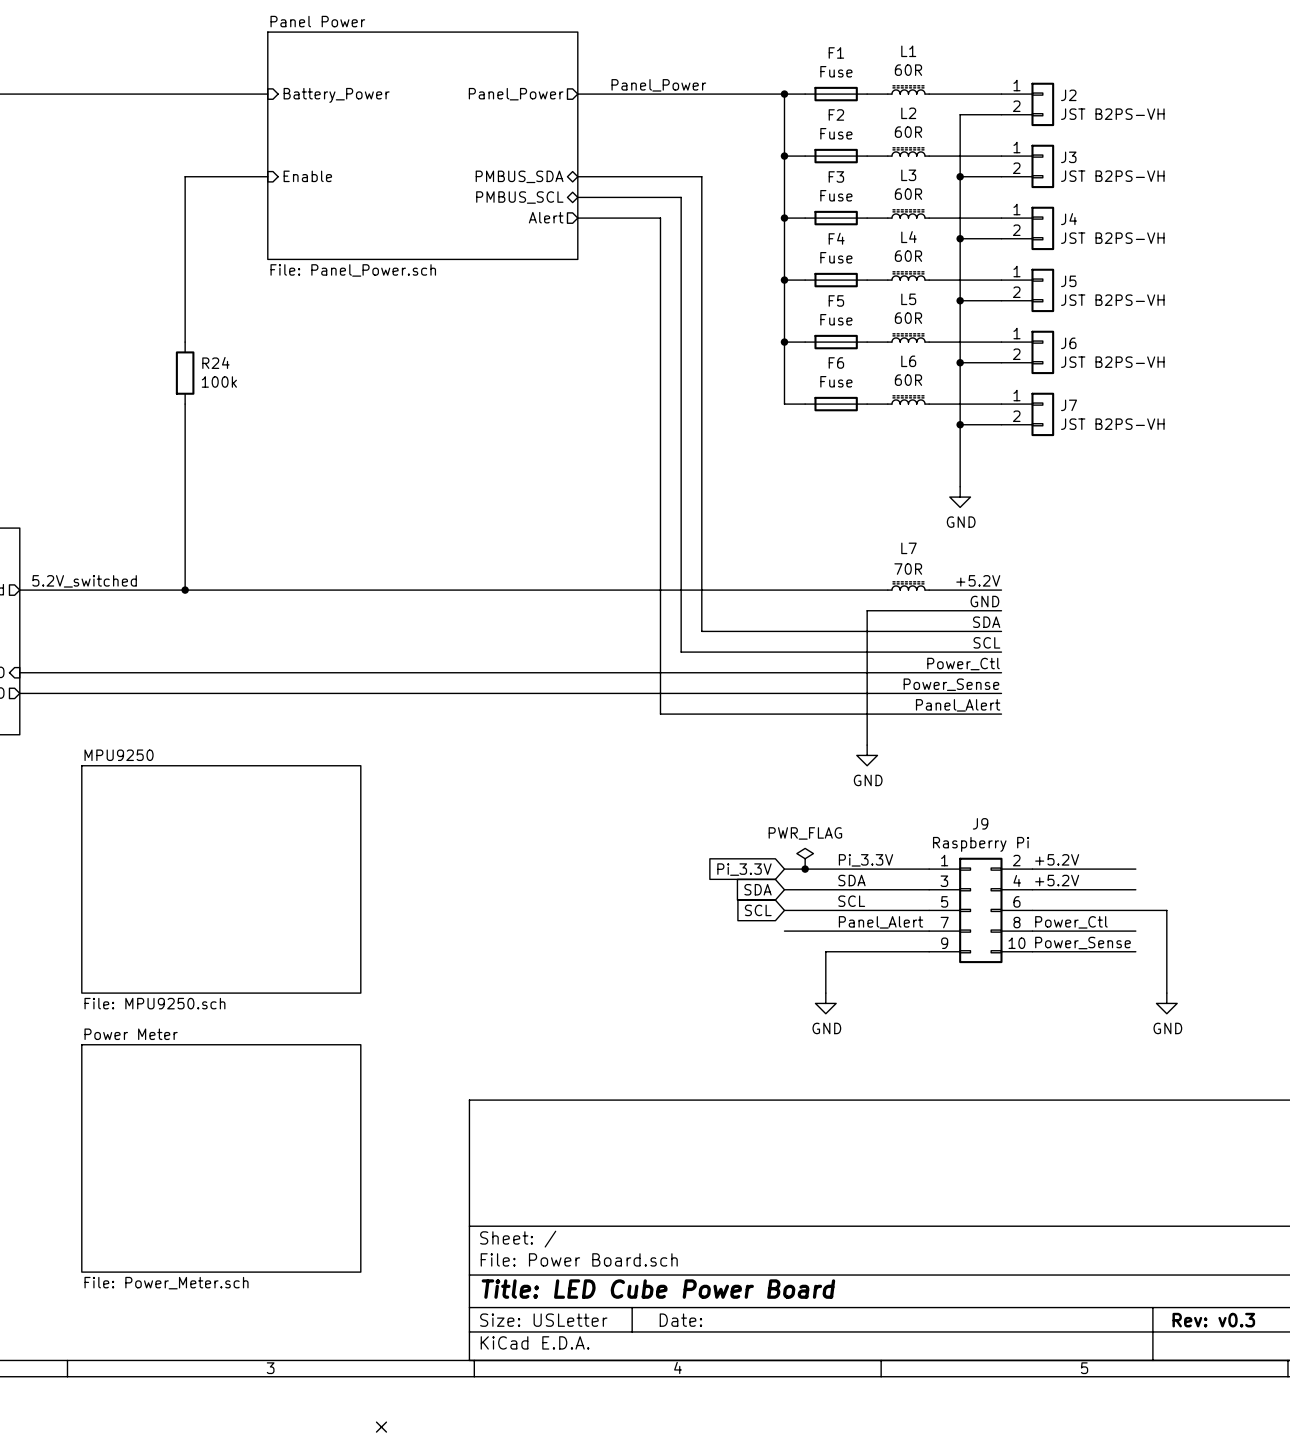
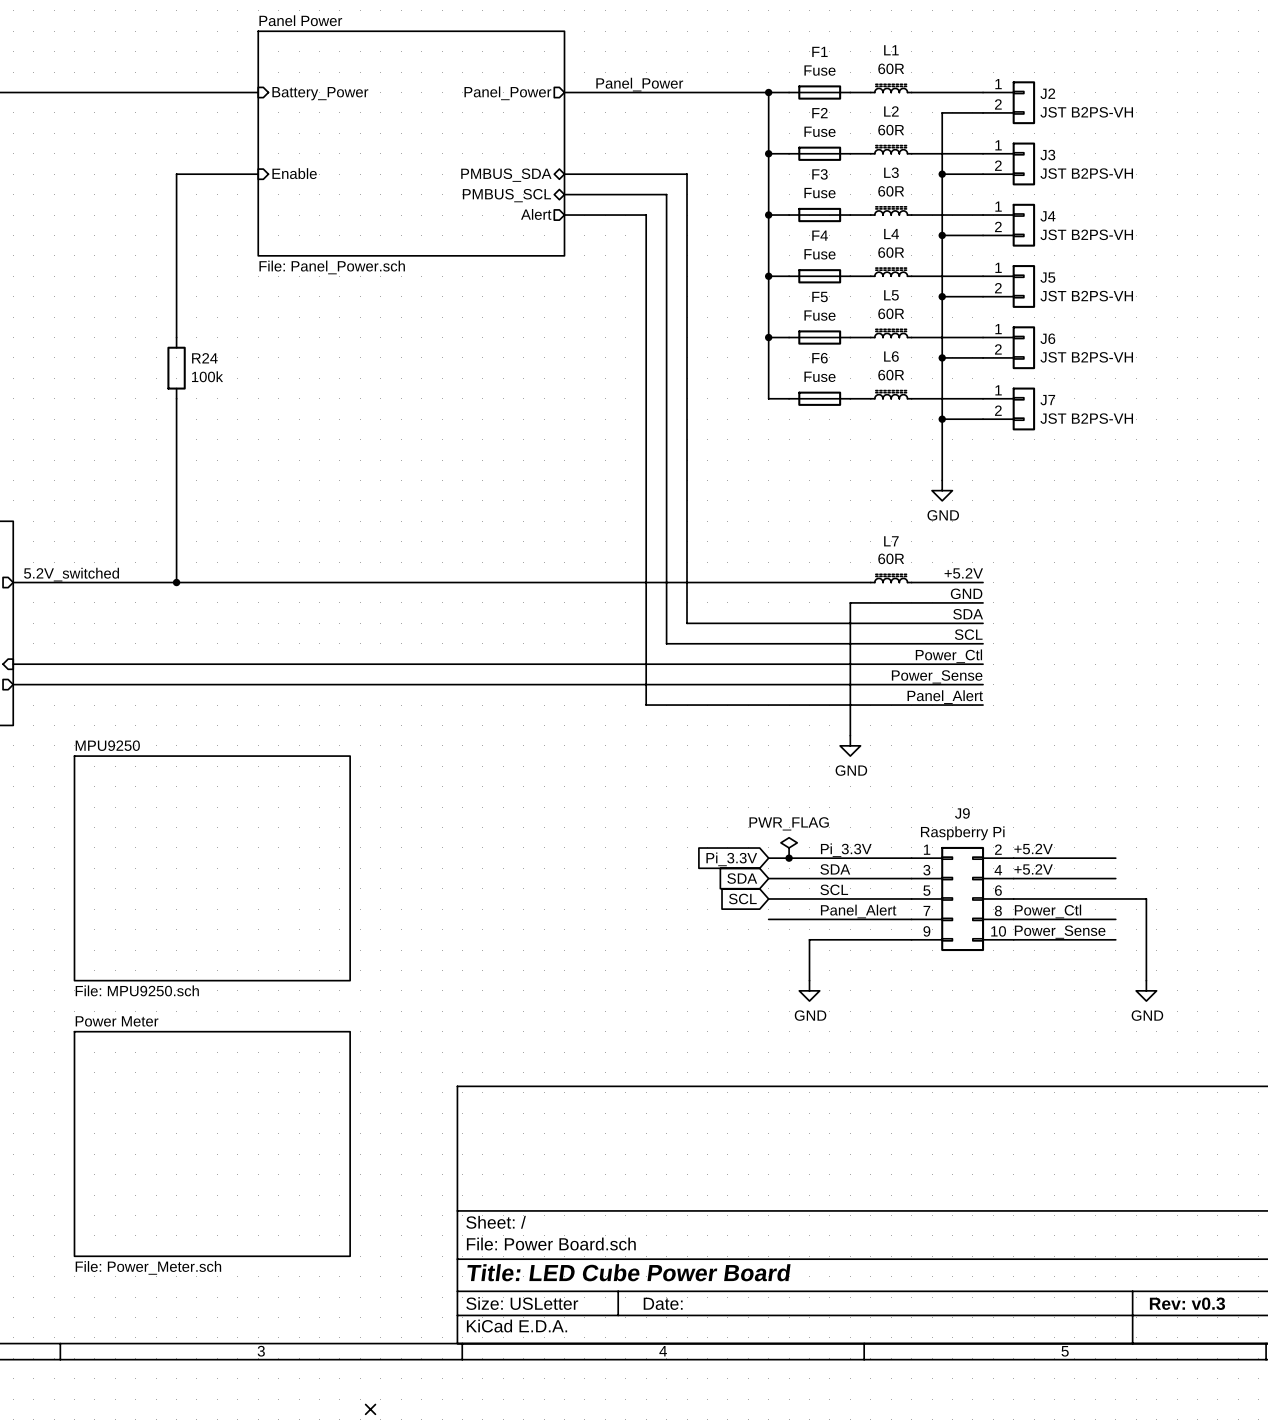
L7 value: 70R (908, 569) -> 60R (891, 558)

